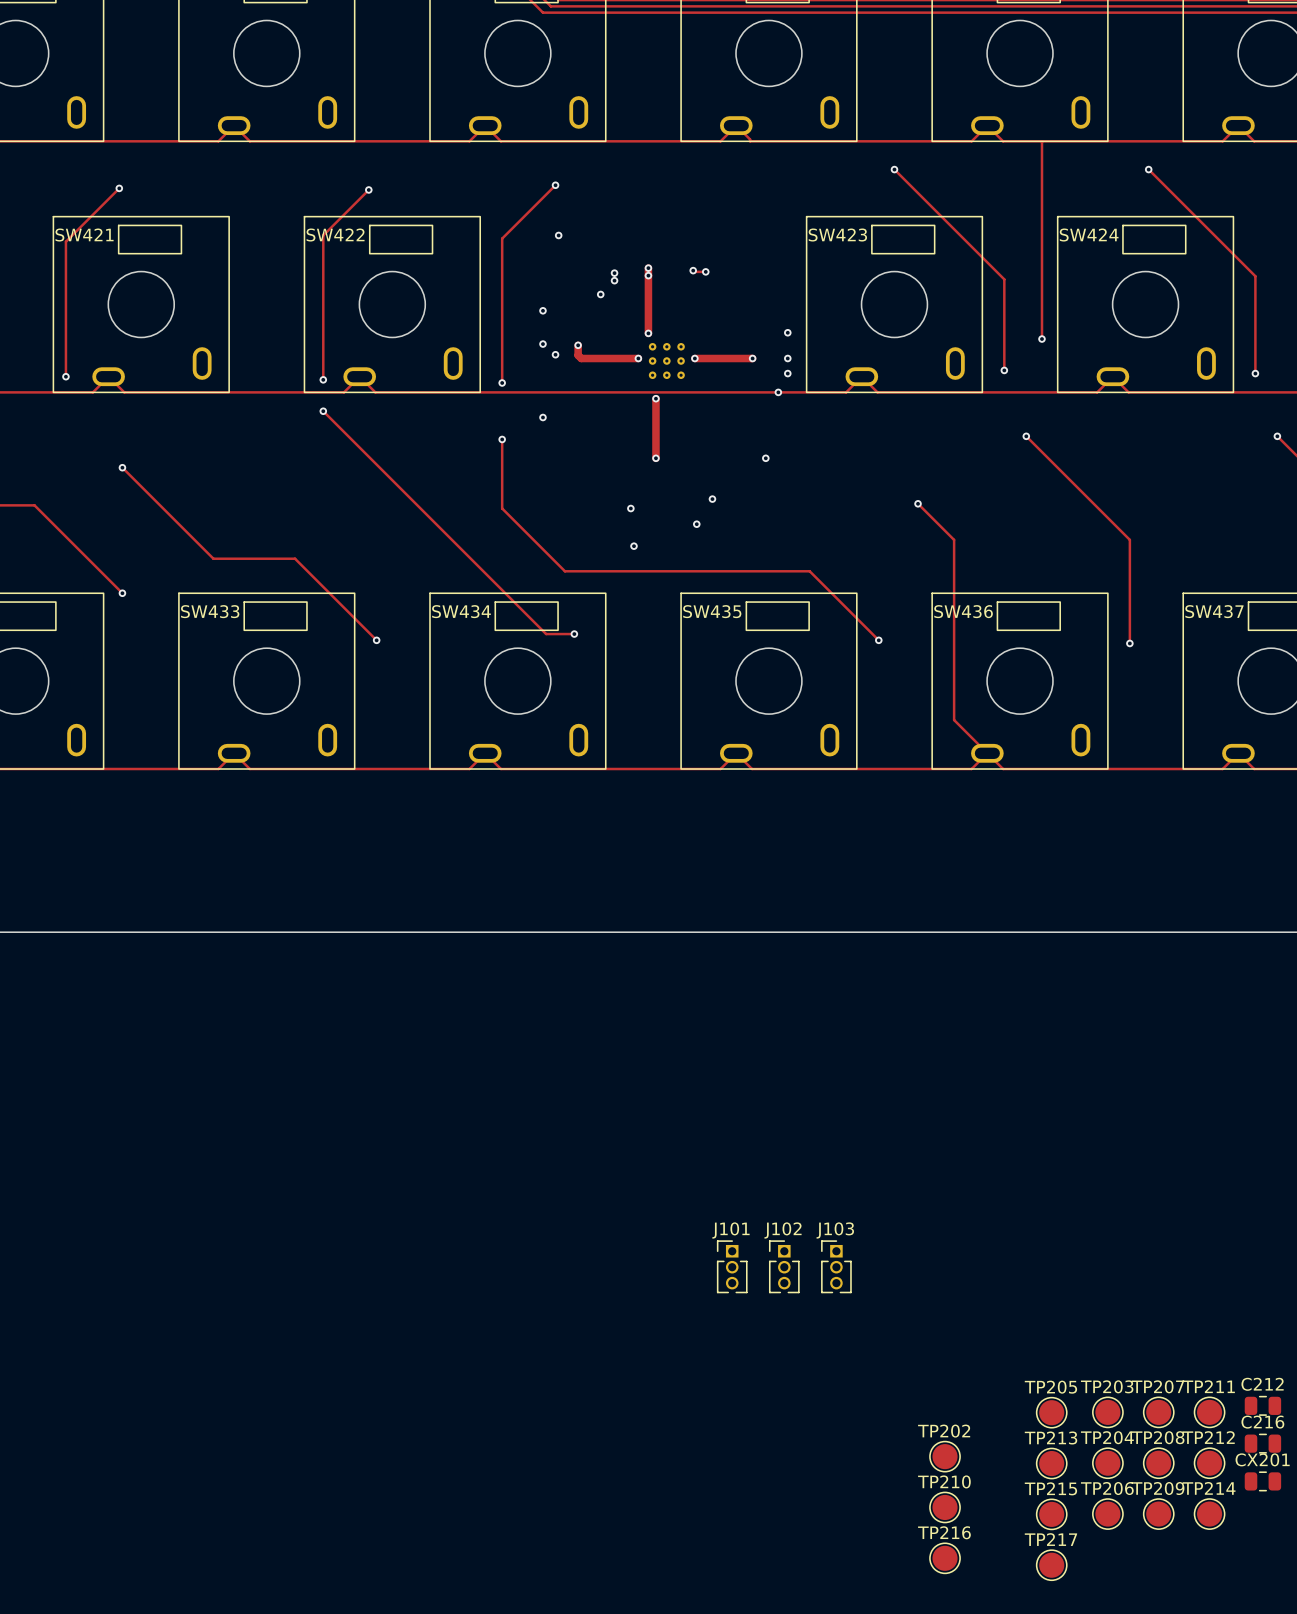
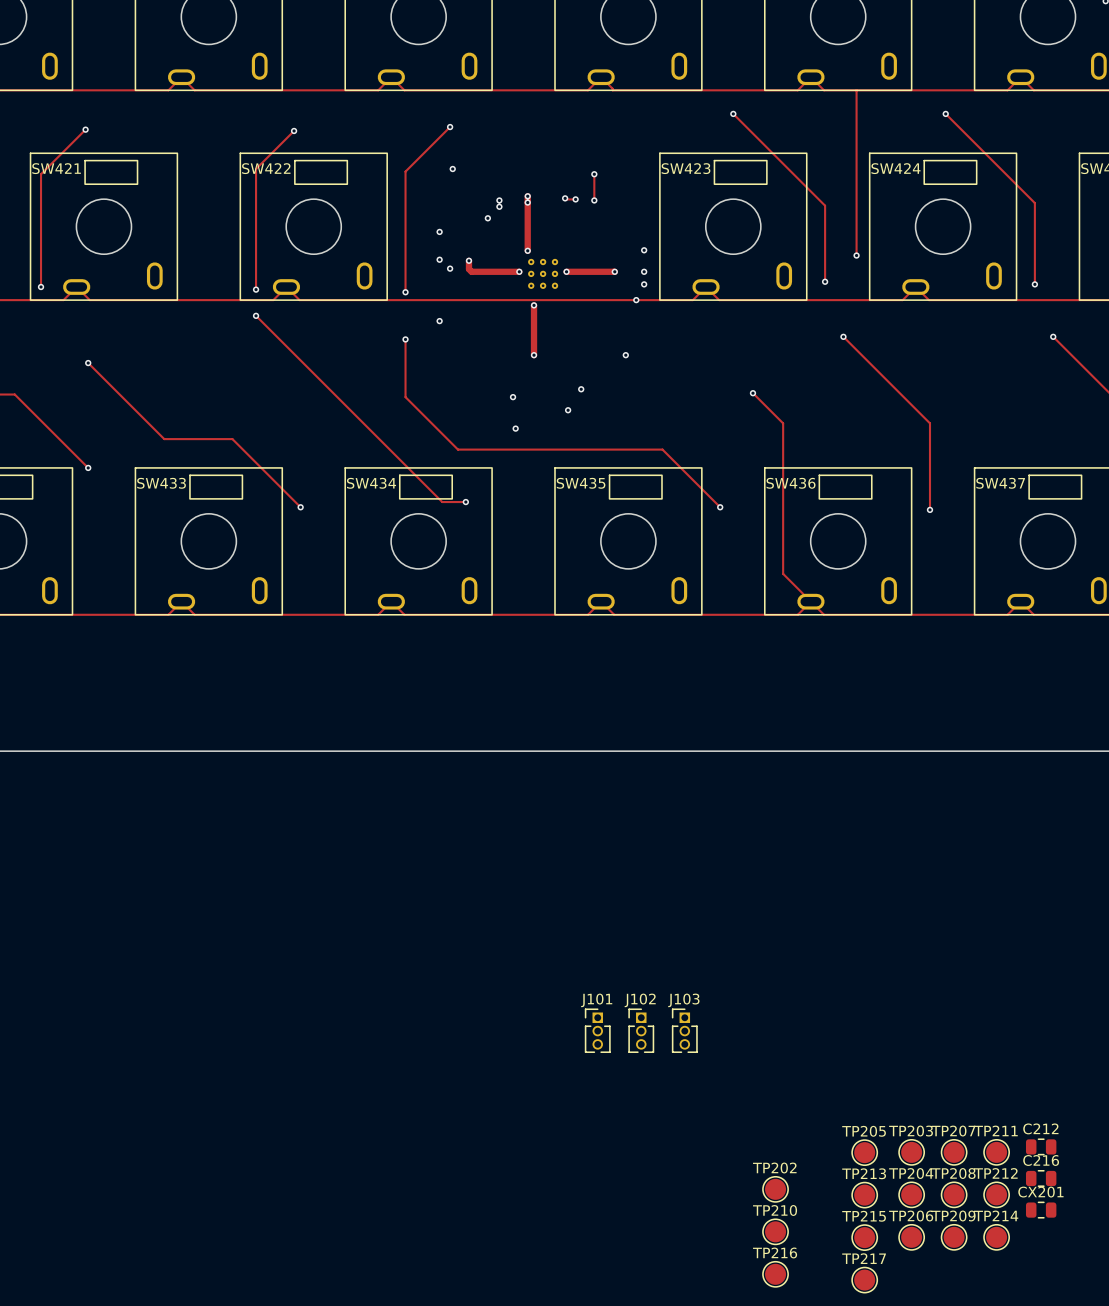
track: none -> (594, 174) (594, 200)
via: none -> (594, 174)
via: none -> (594, 200)

